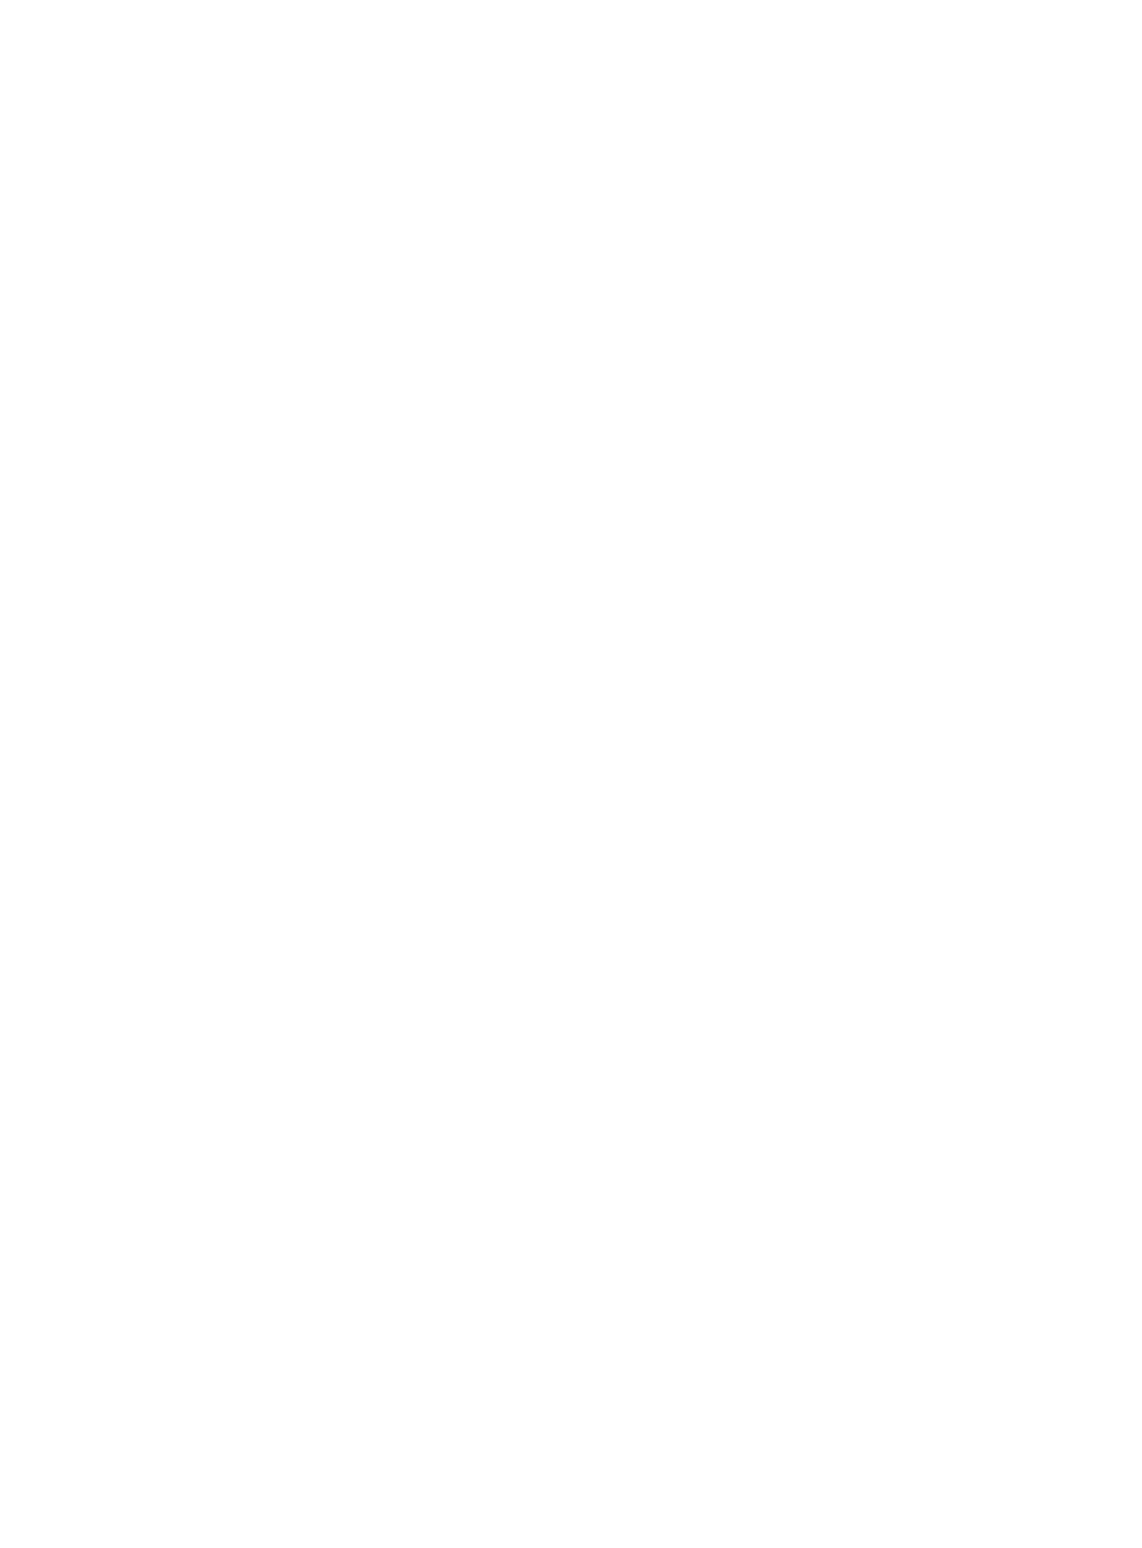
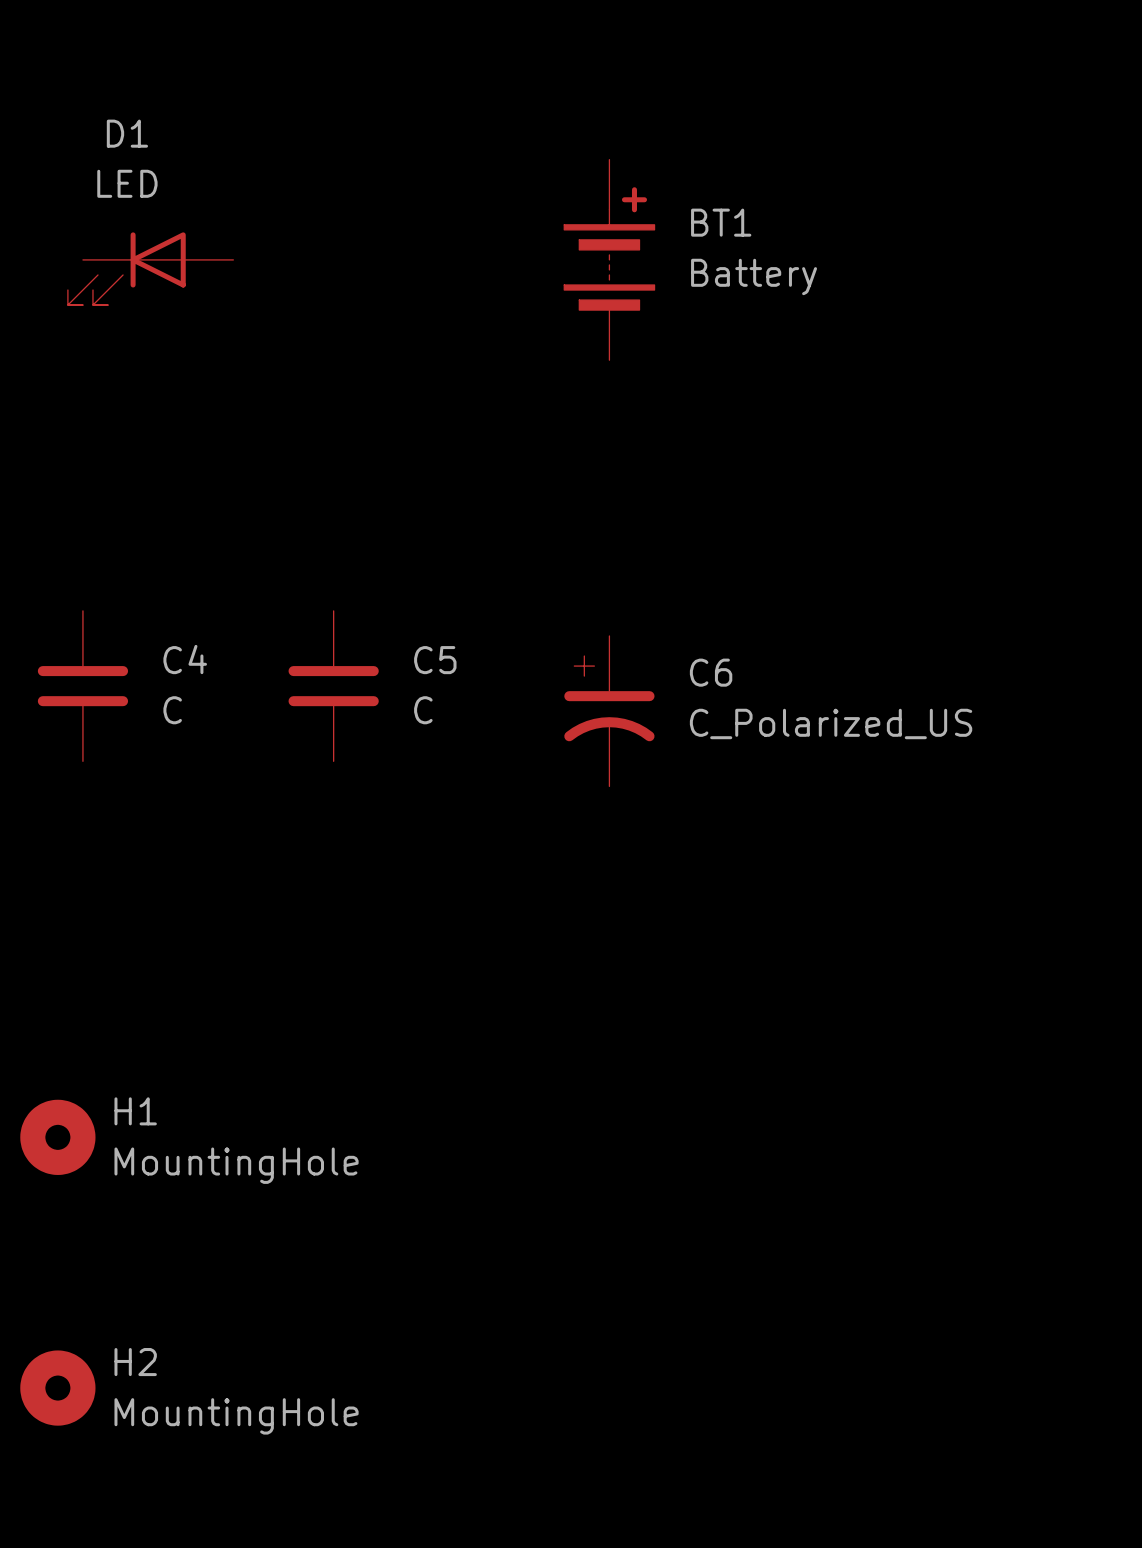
BT1: none -> Battery (609, 259)
D1: none -> LED (150, 268)
C4: none -> C (82, 686)
C5: none -> C (333, 686)
C6: none -> C_Polarized_US (609, 711)
H1: none -> MountingHole (57, 1137)
H2: none -> MountingHole (57, 1388)

